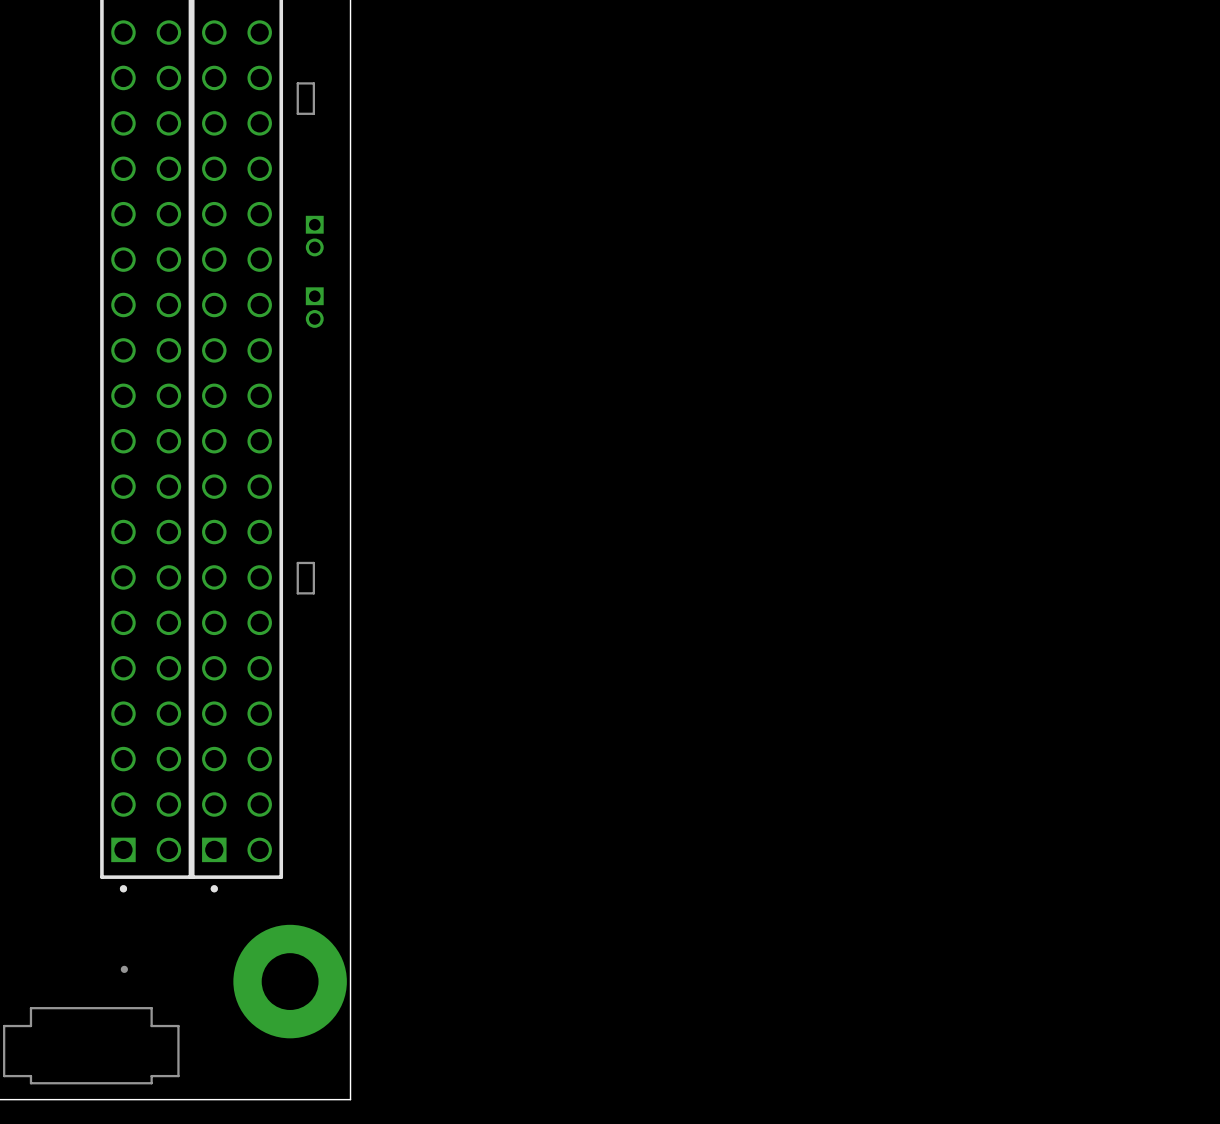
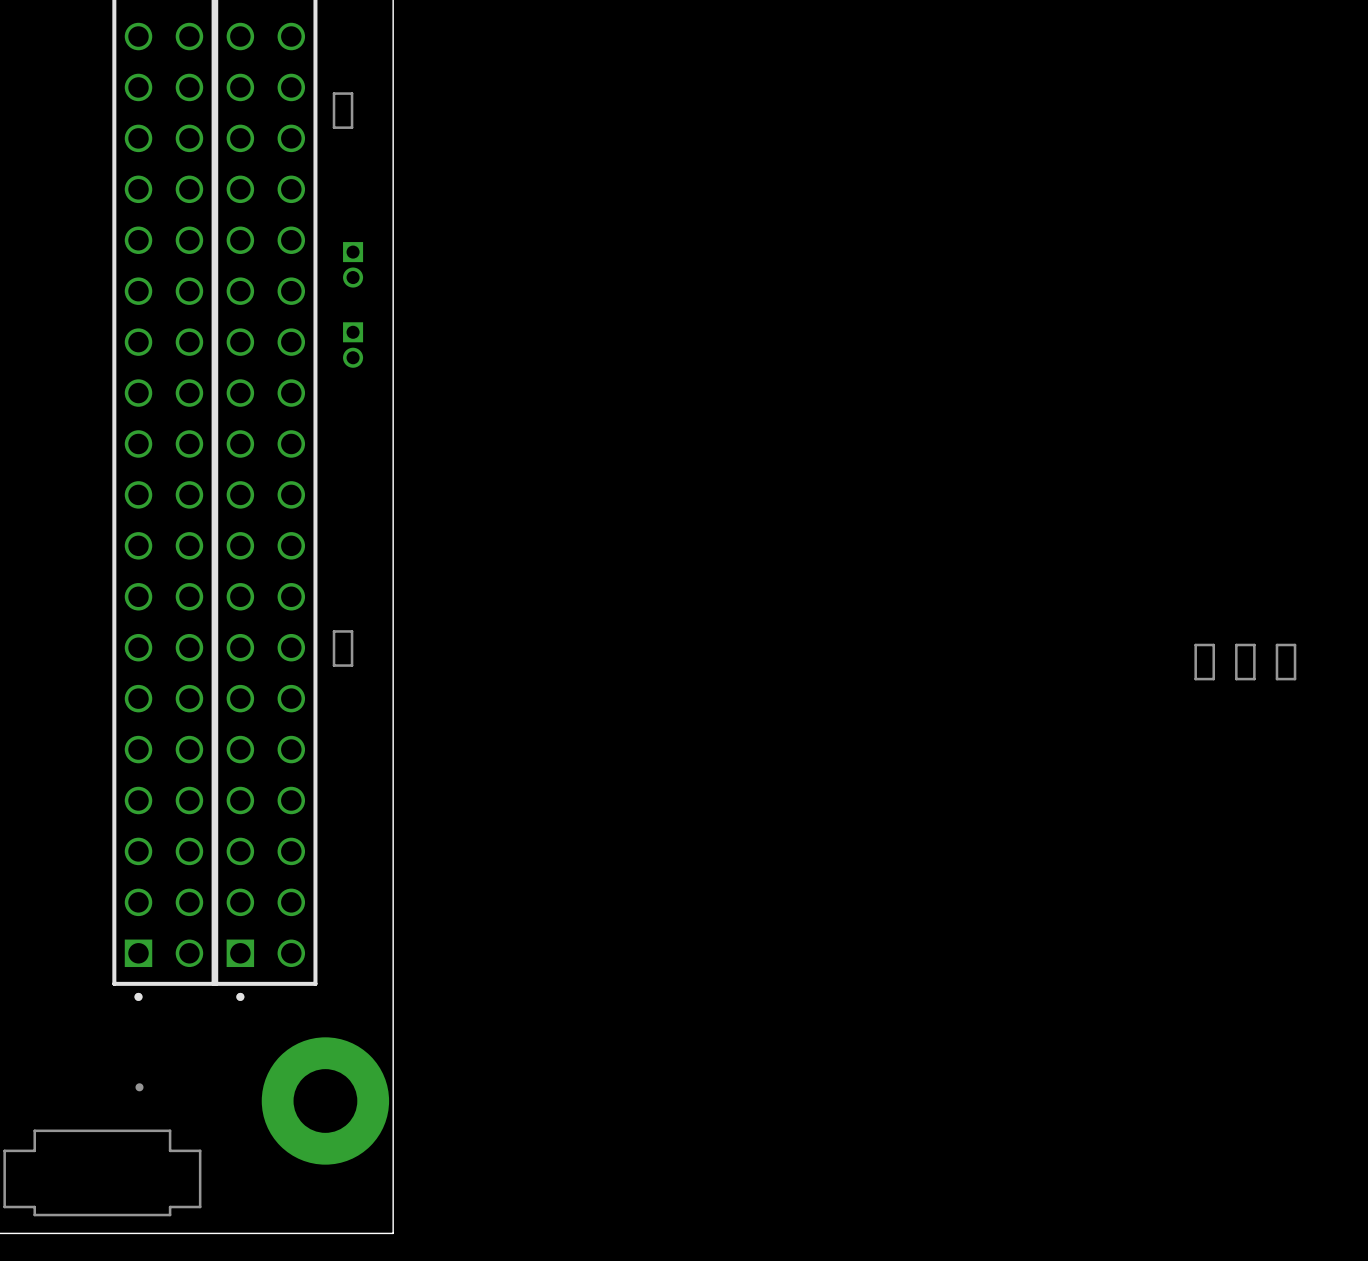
part: none -> (1204, 662)
part: none -> (1245, 662)
part: none -> (1286, 662)

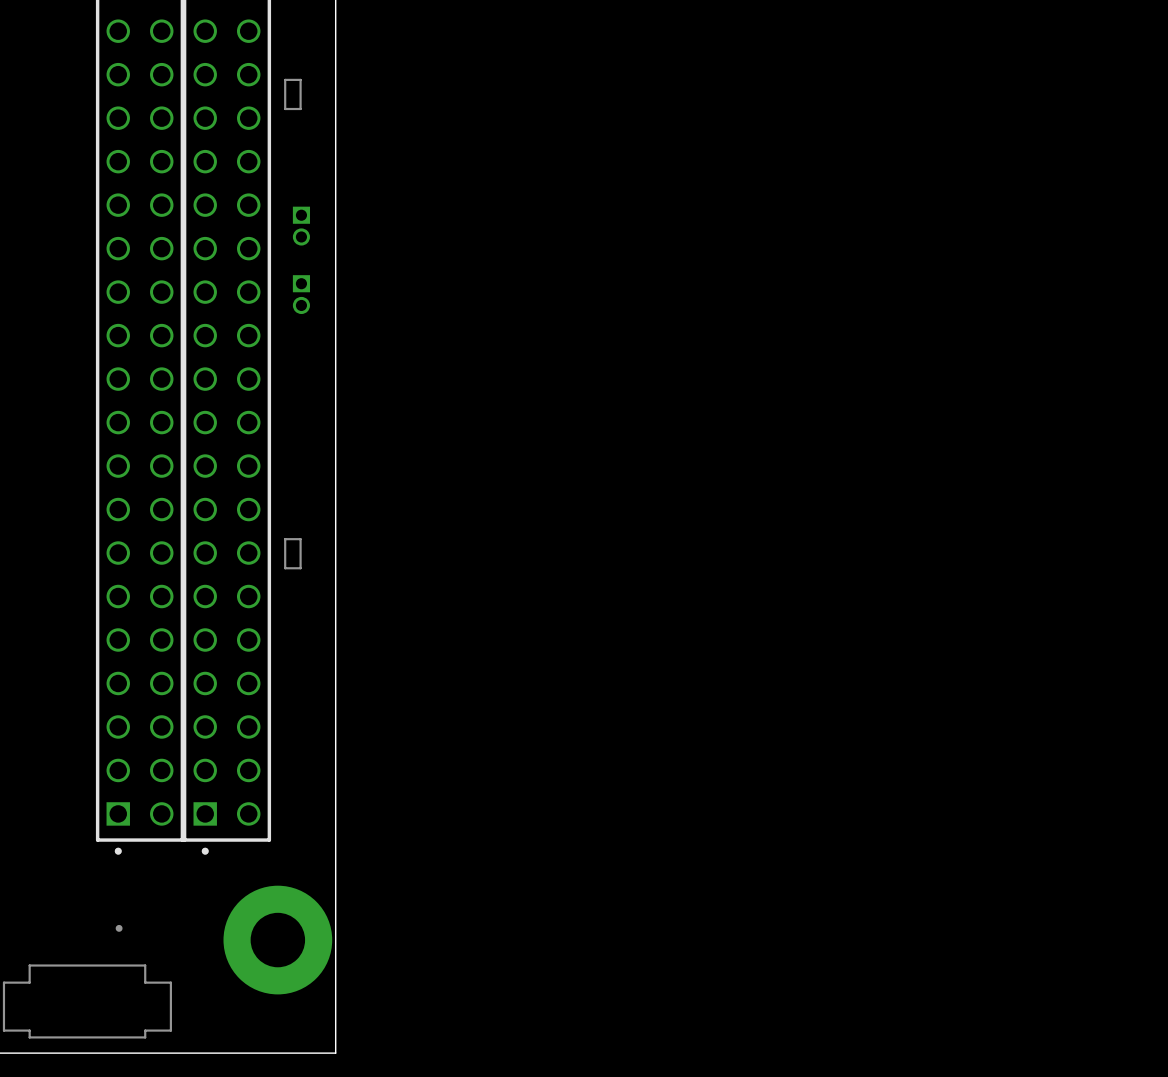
part: (1204, 662) -> none
part: (1245, 662) -> none
part: (1286, 662) -> none

